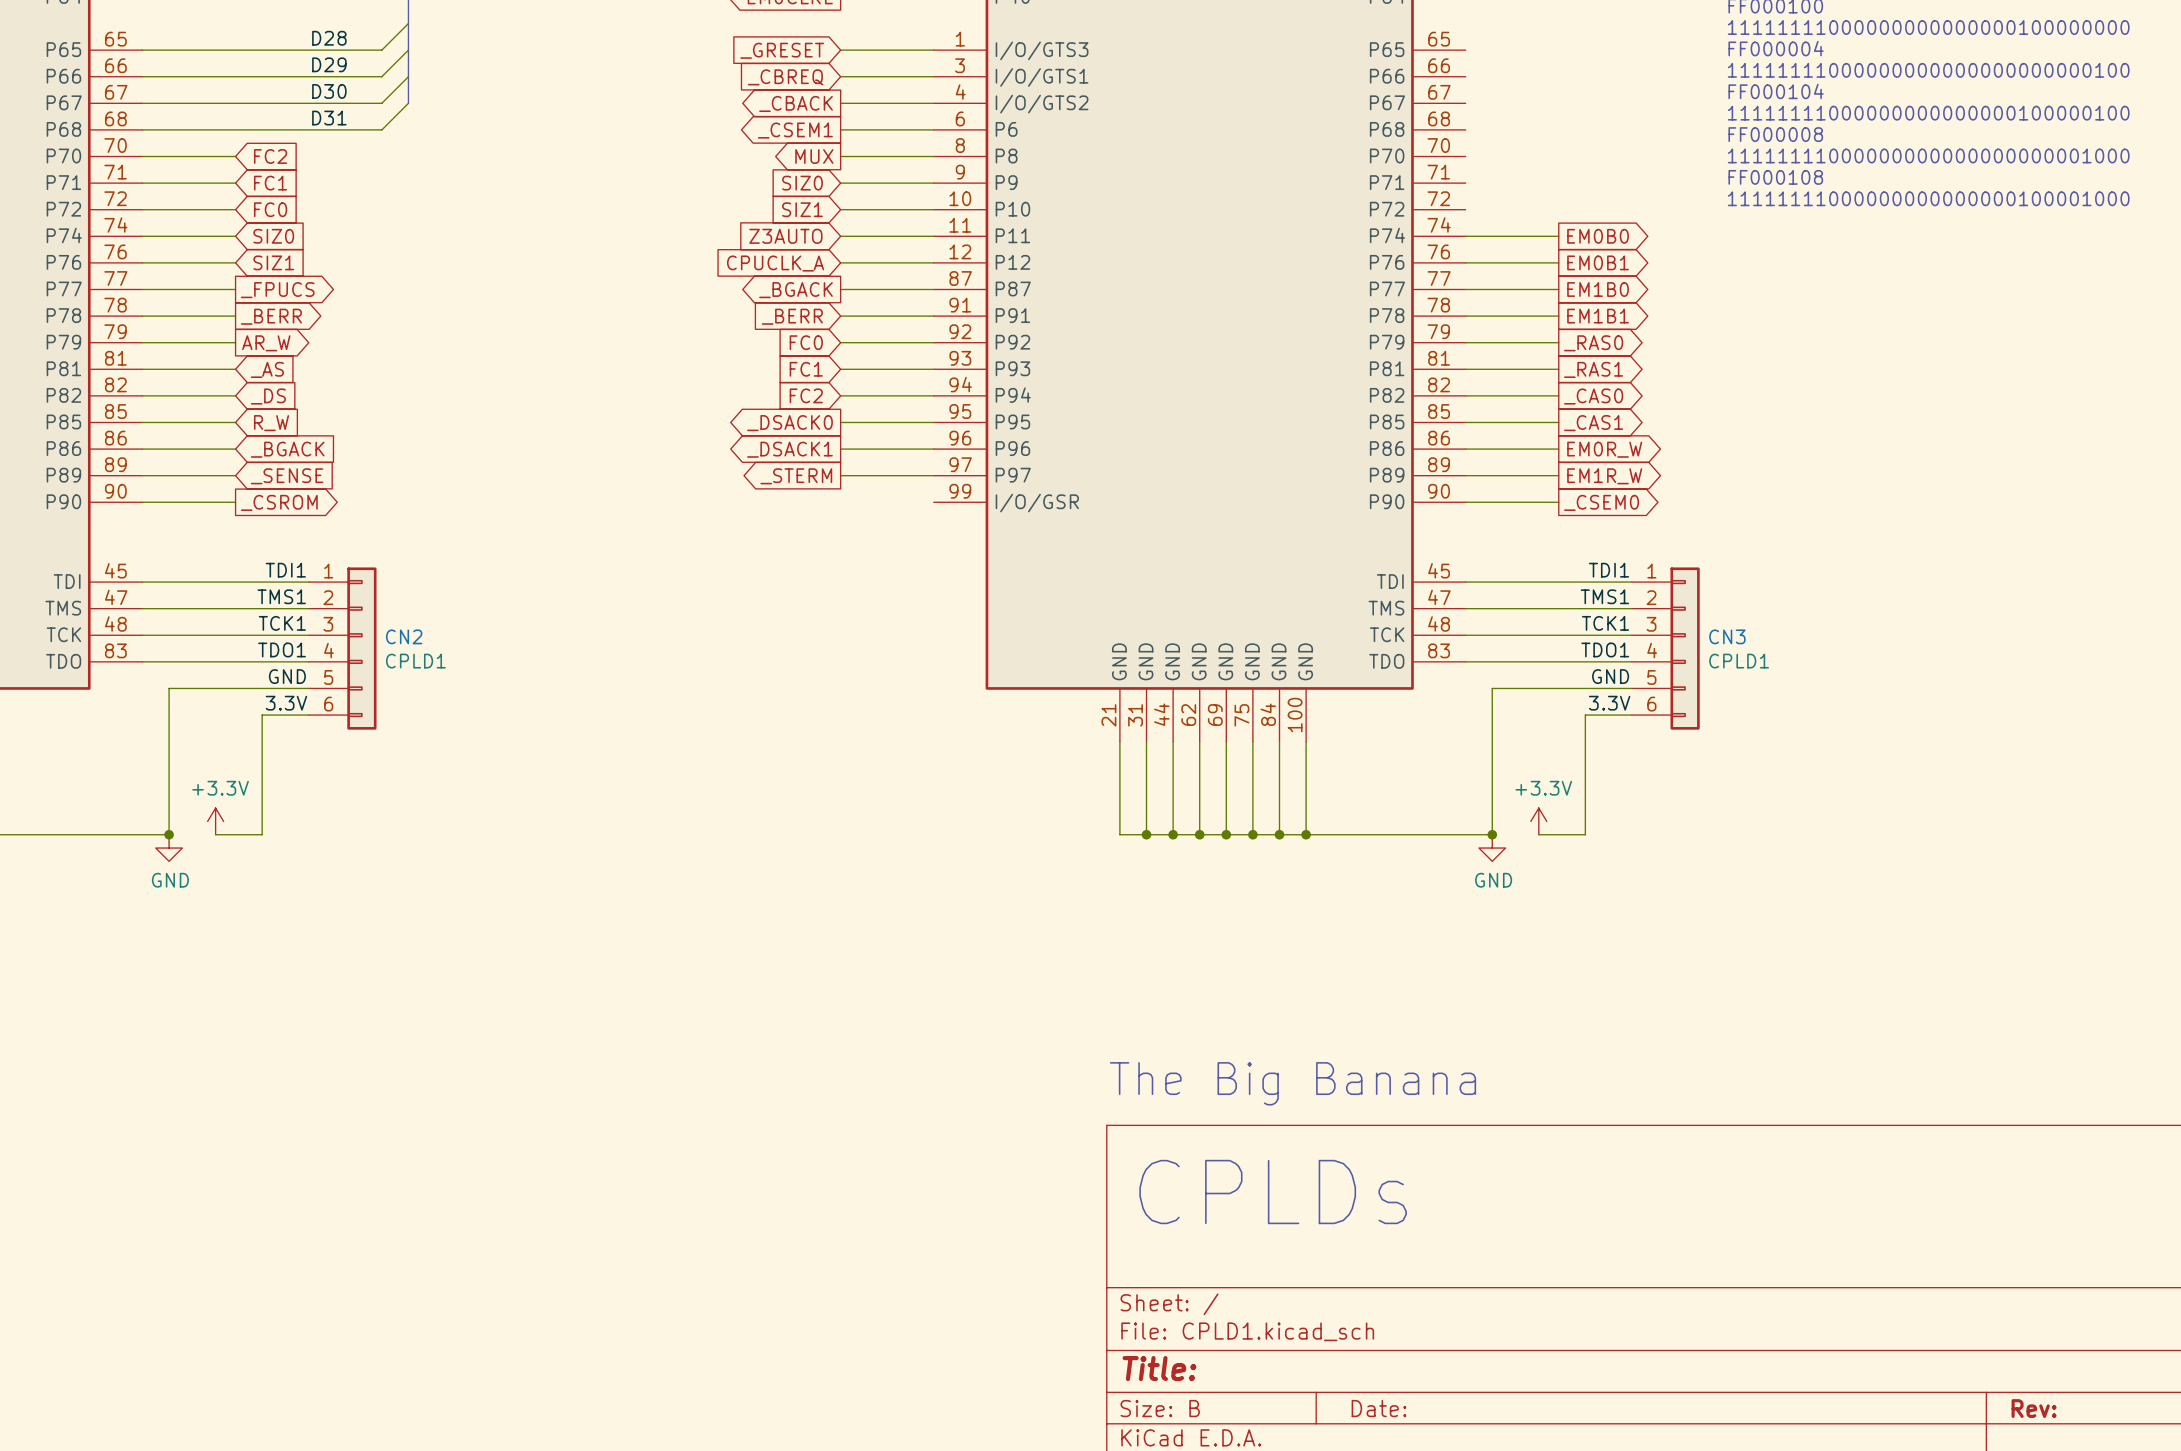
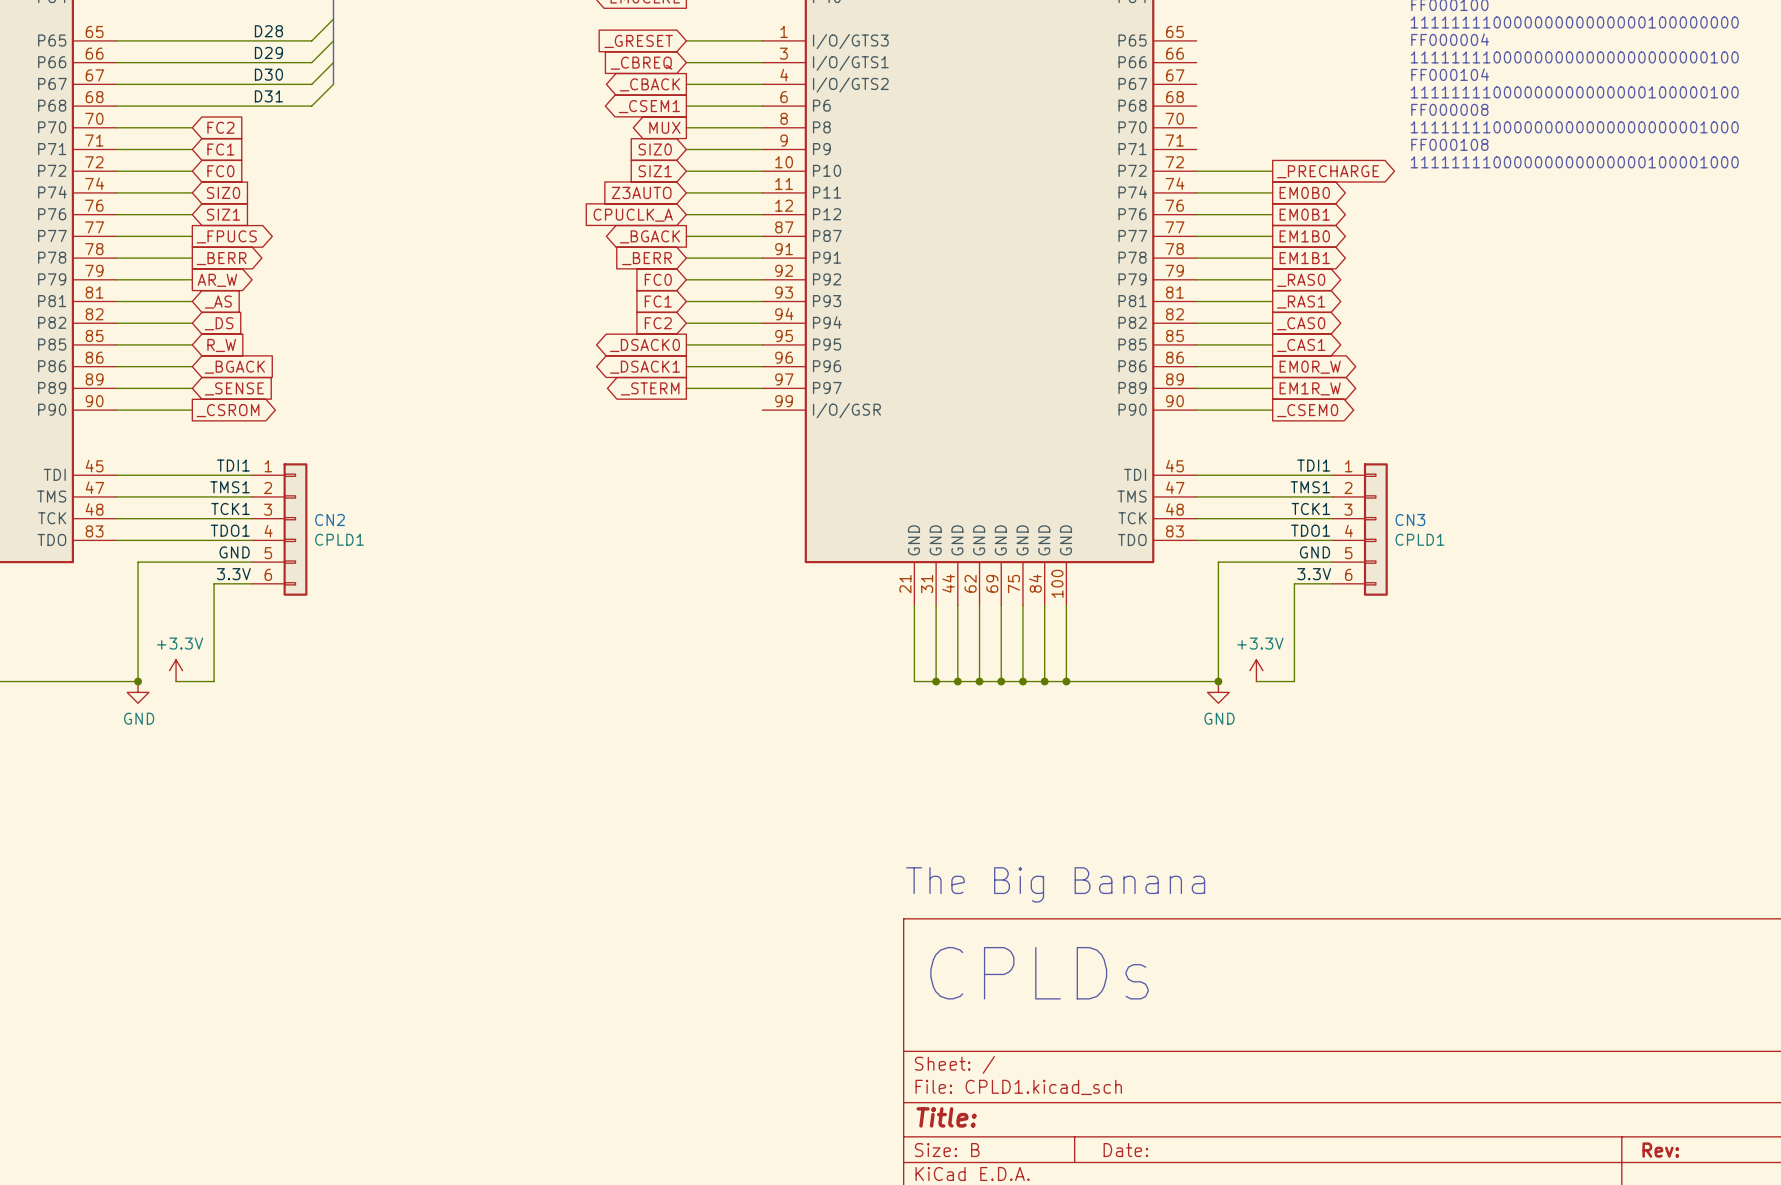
wire: none -> (1196, 171) (1272, 171)
global label: none -> _PRECHARGE (1328, 171)

